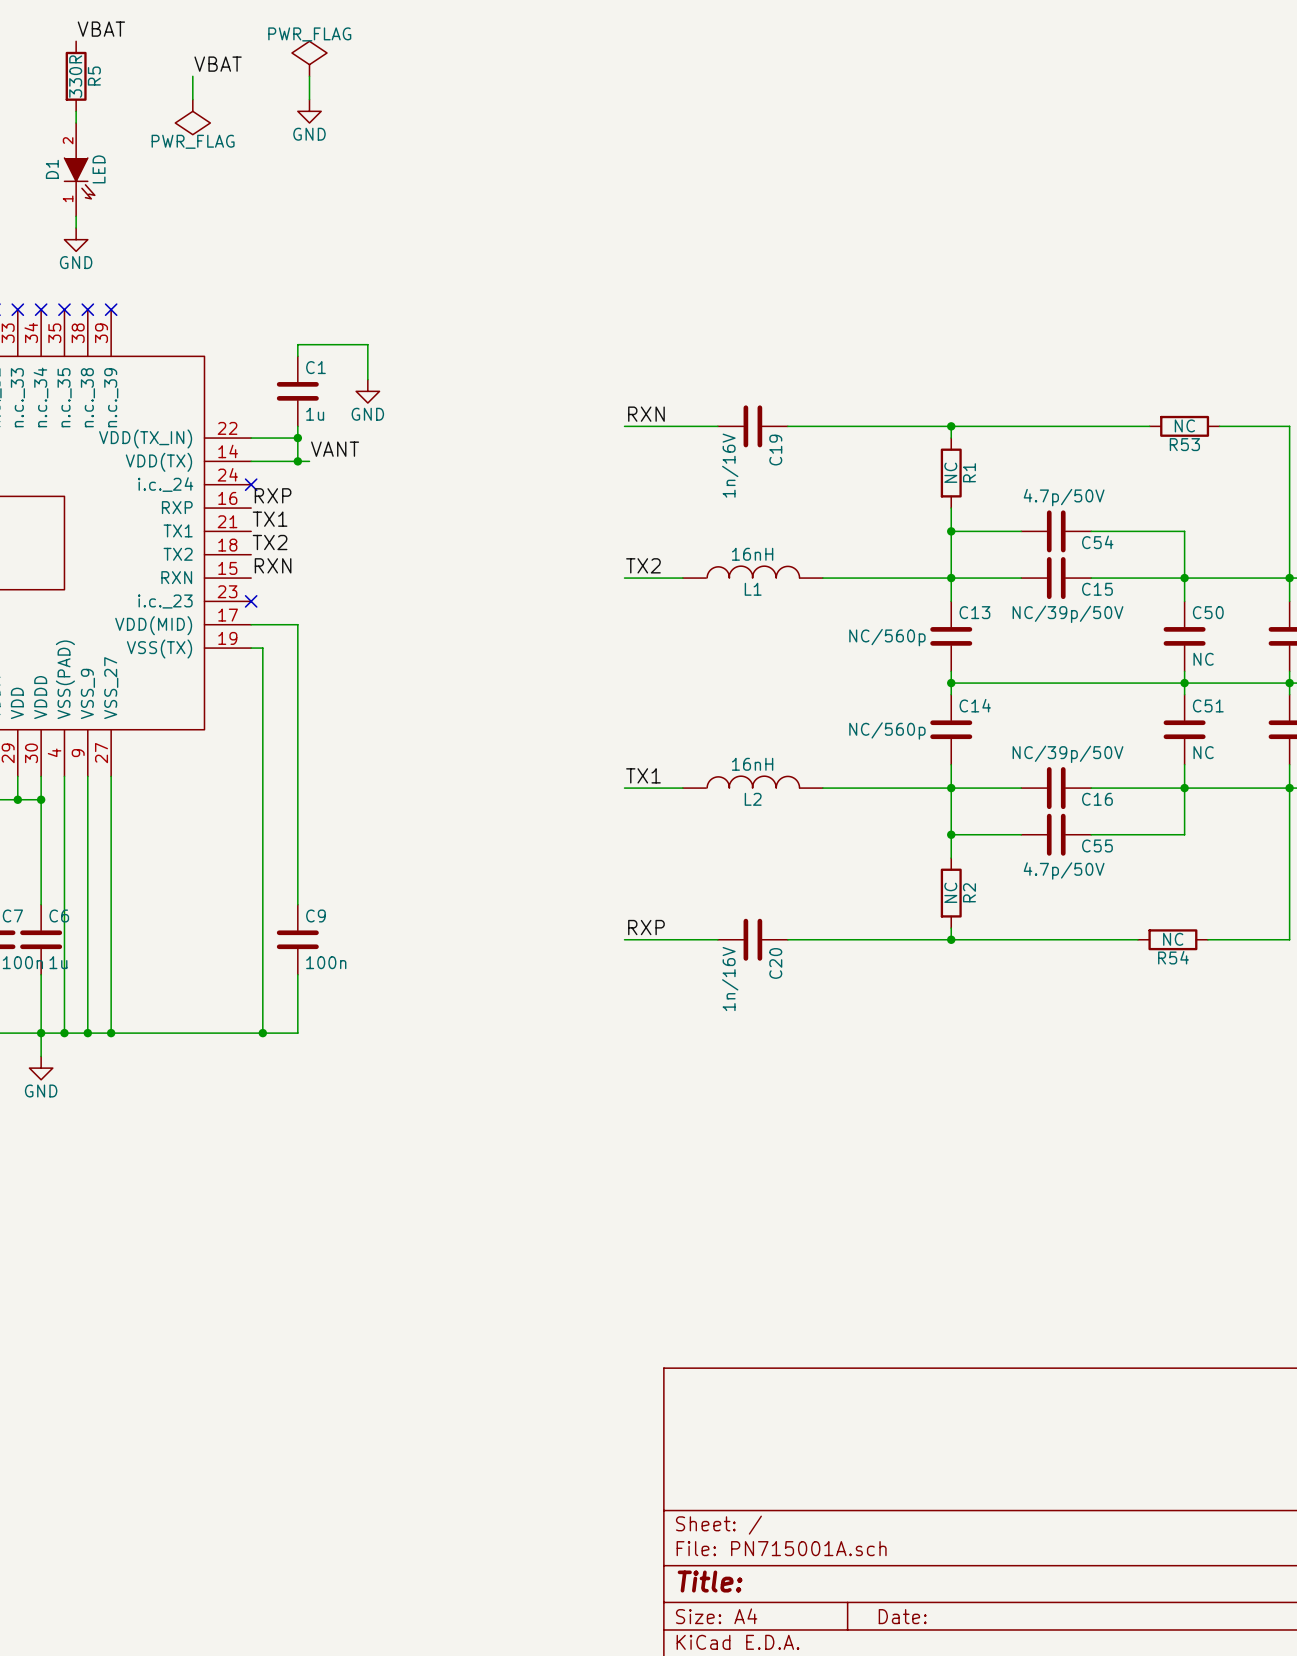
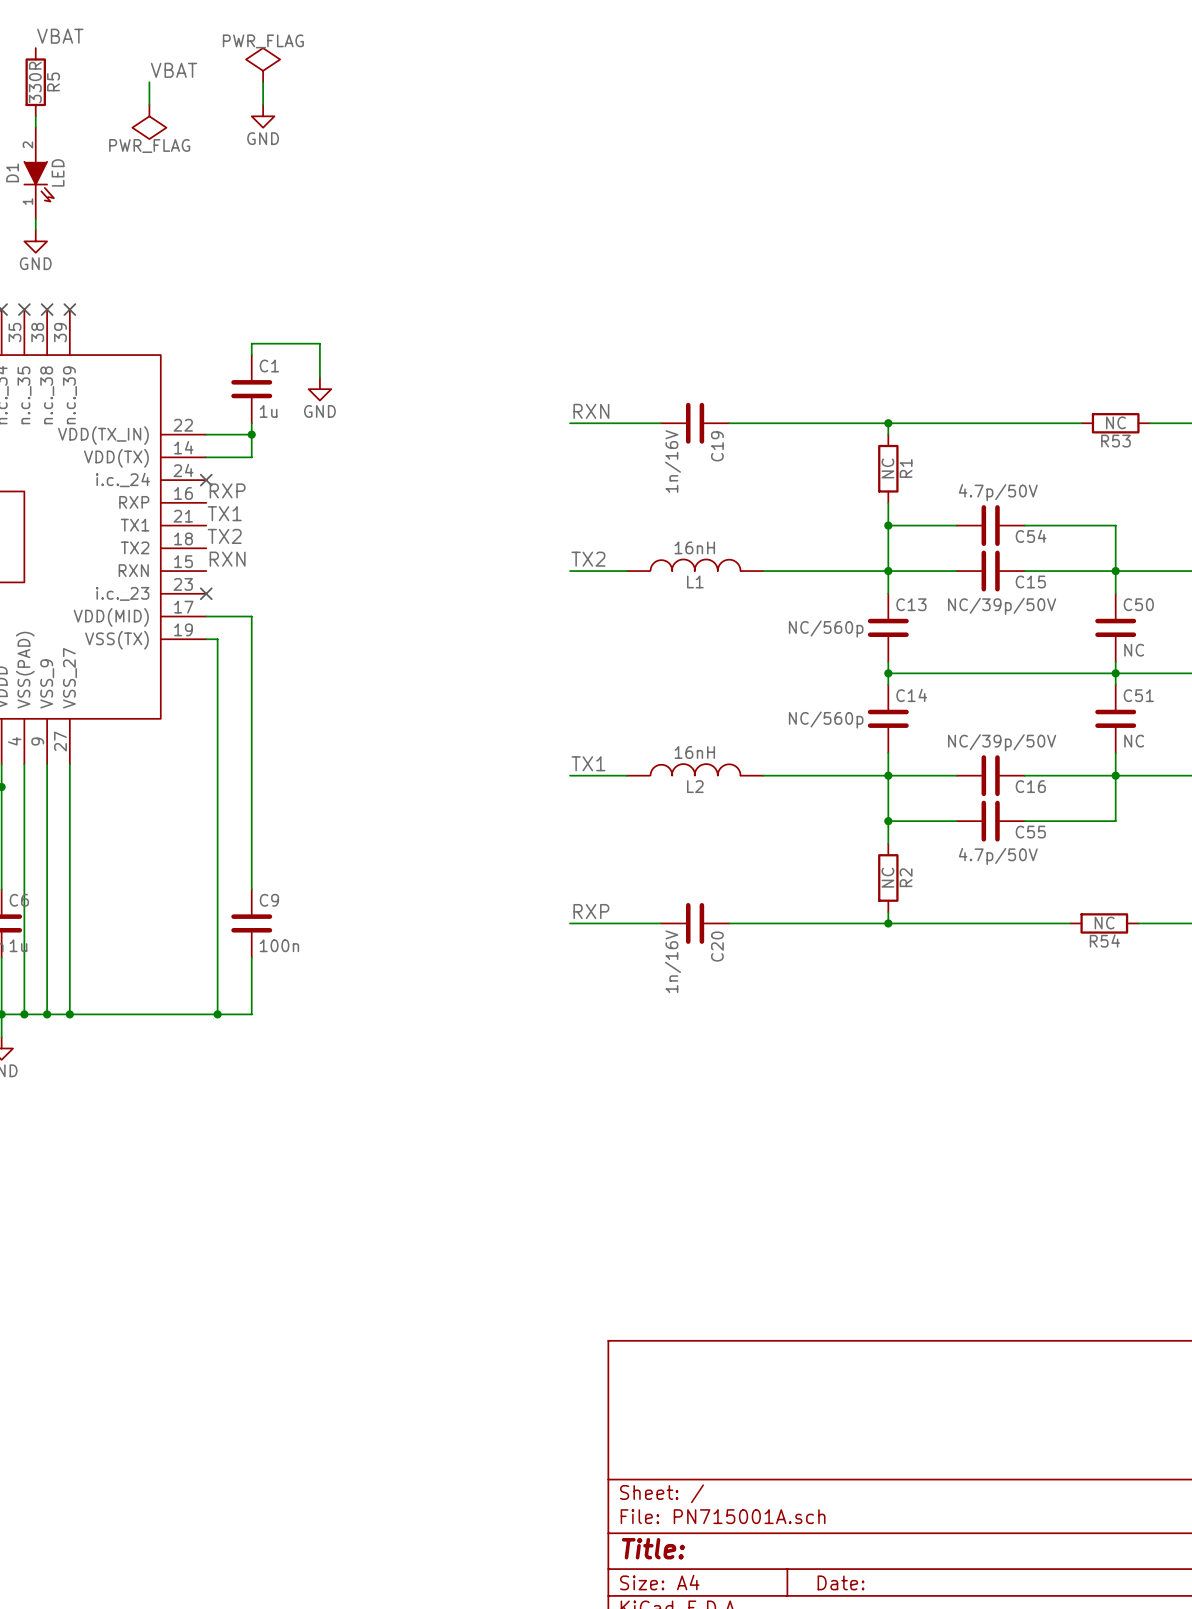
label: VANT (335, 449) -> none
wire: (297, 461) (309, 461) -> none
junction: (297, 461) -> none

